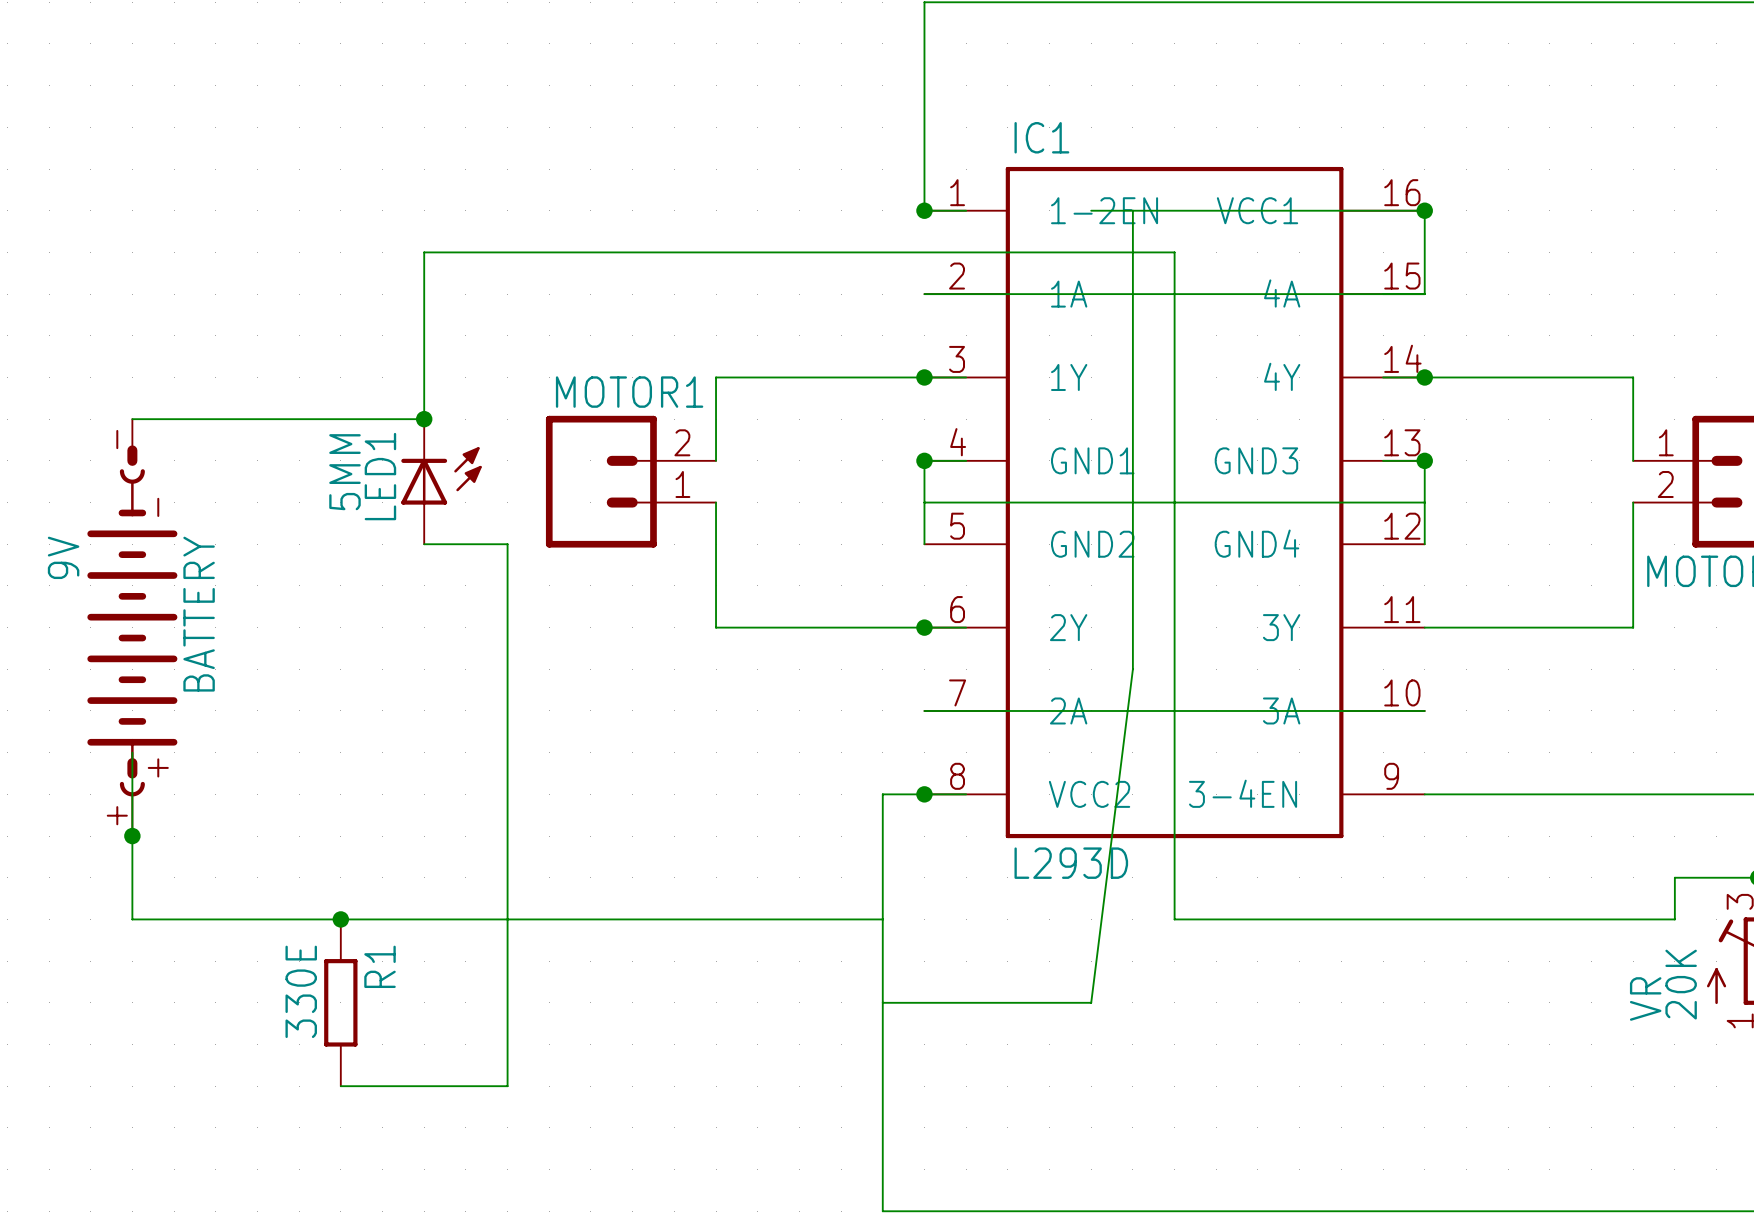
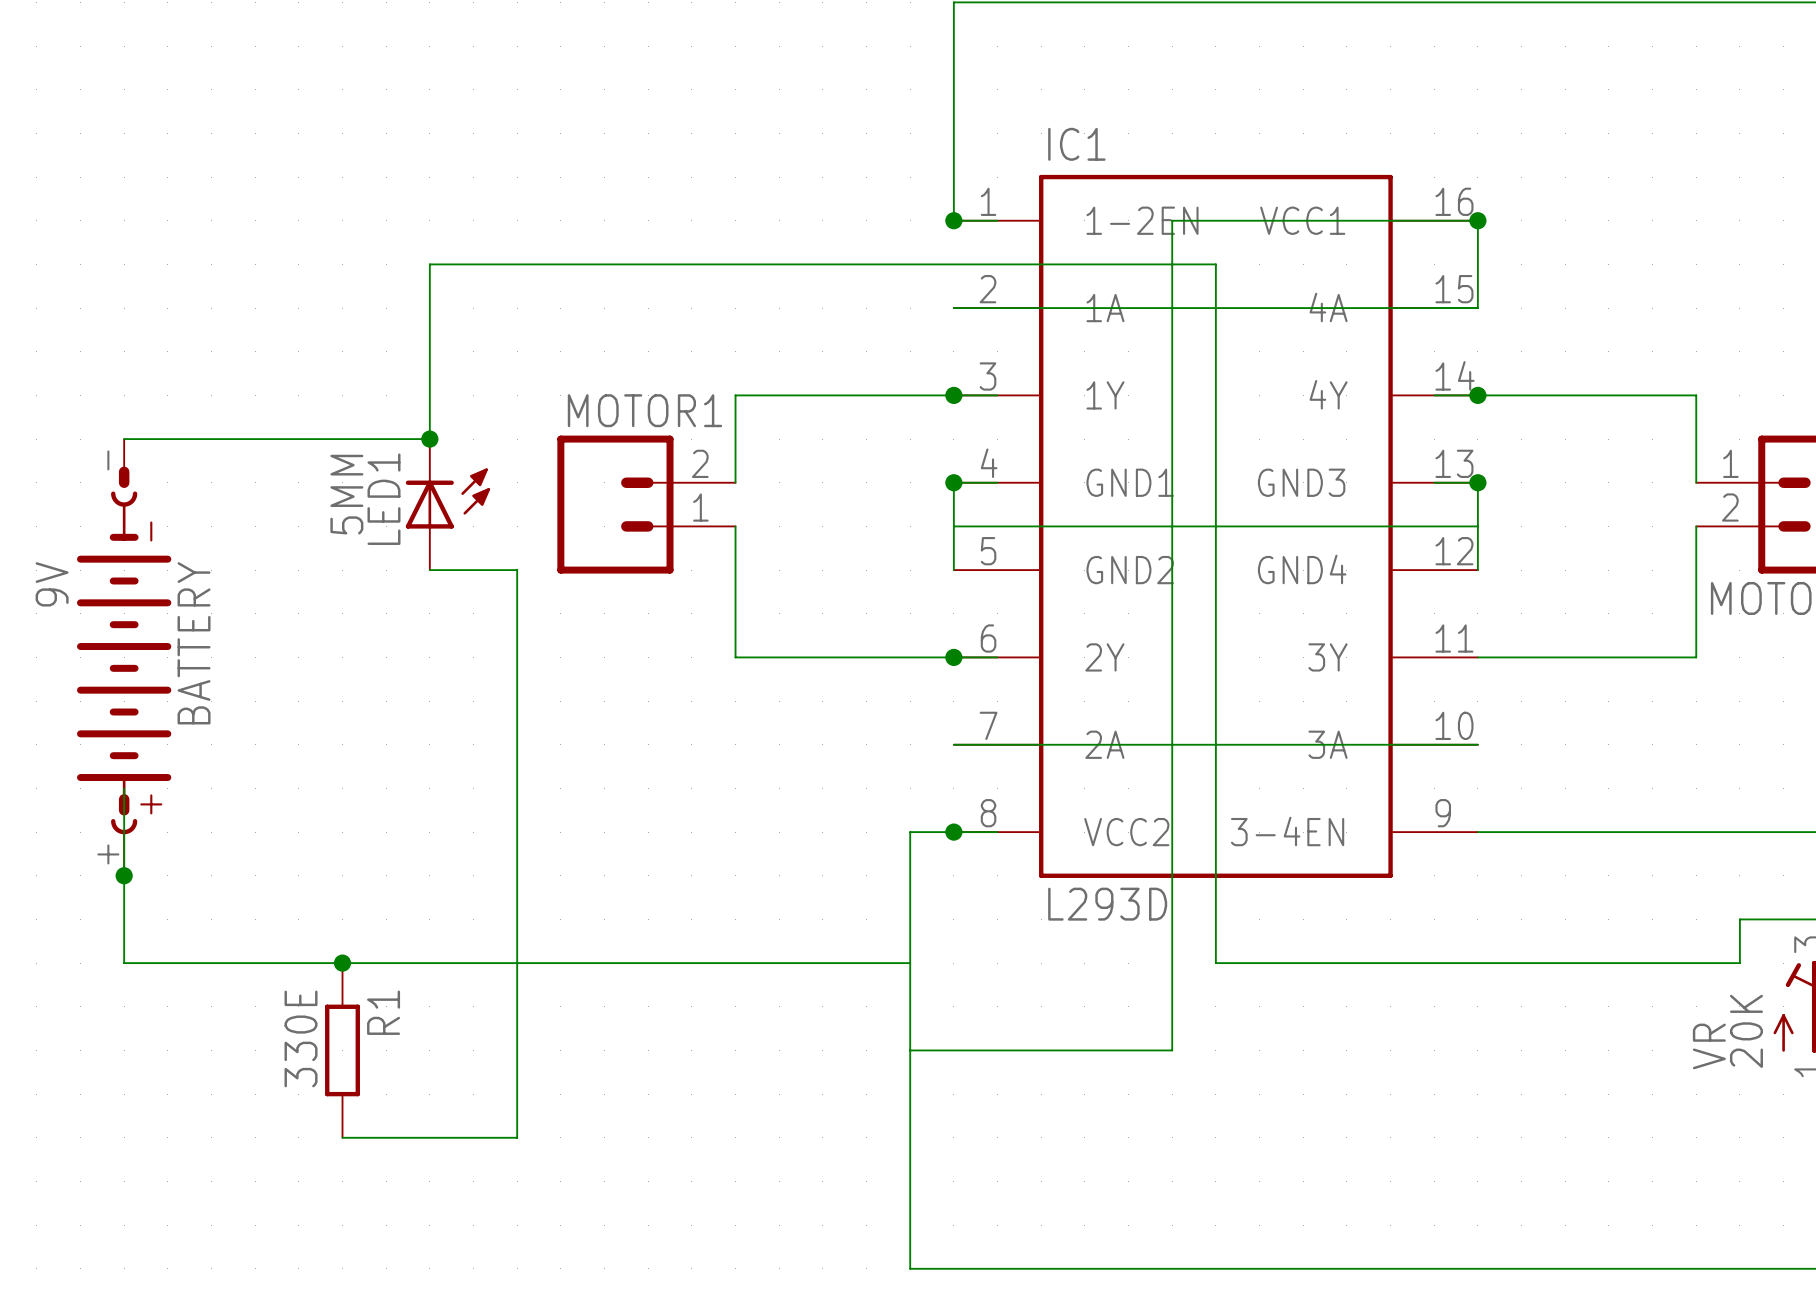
wire: (1091, 210) (1132, 210) -> none
wire: (1132, 669) (1091, 1002) -> (1172, 701) (1172, 1050) (1128, 1050)

